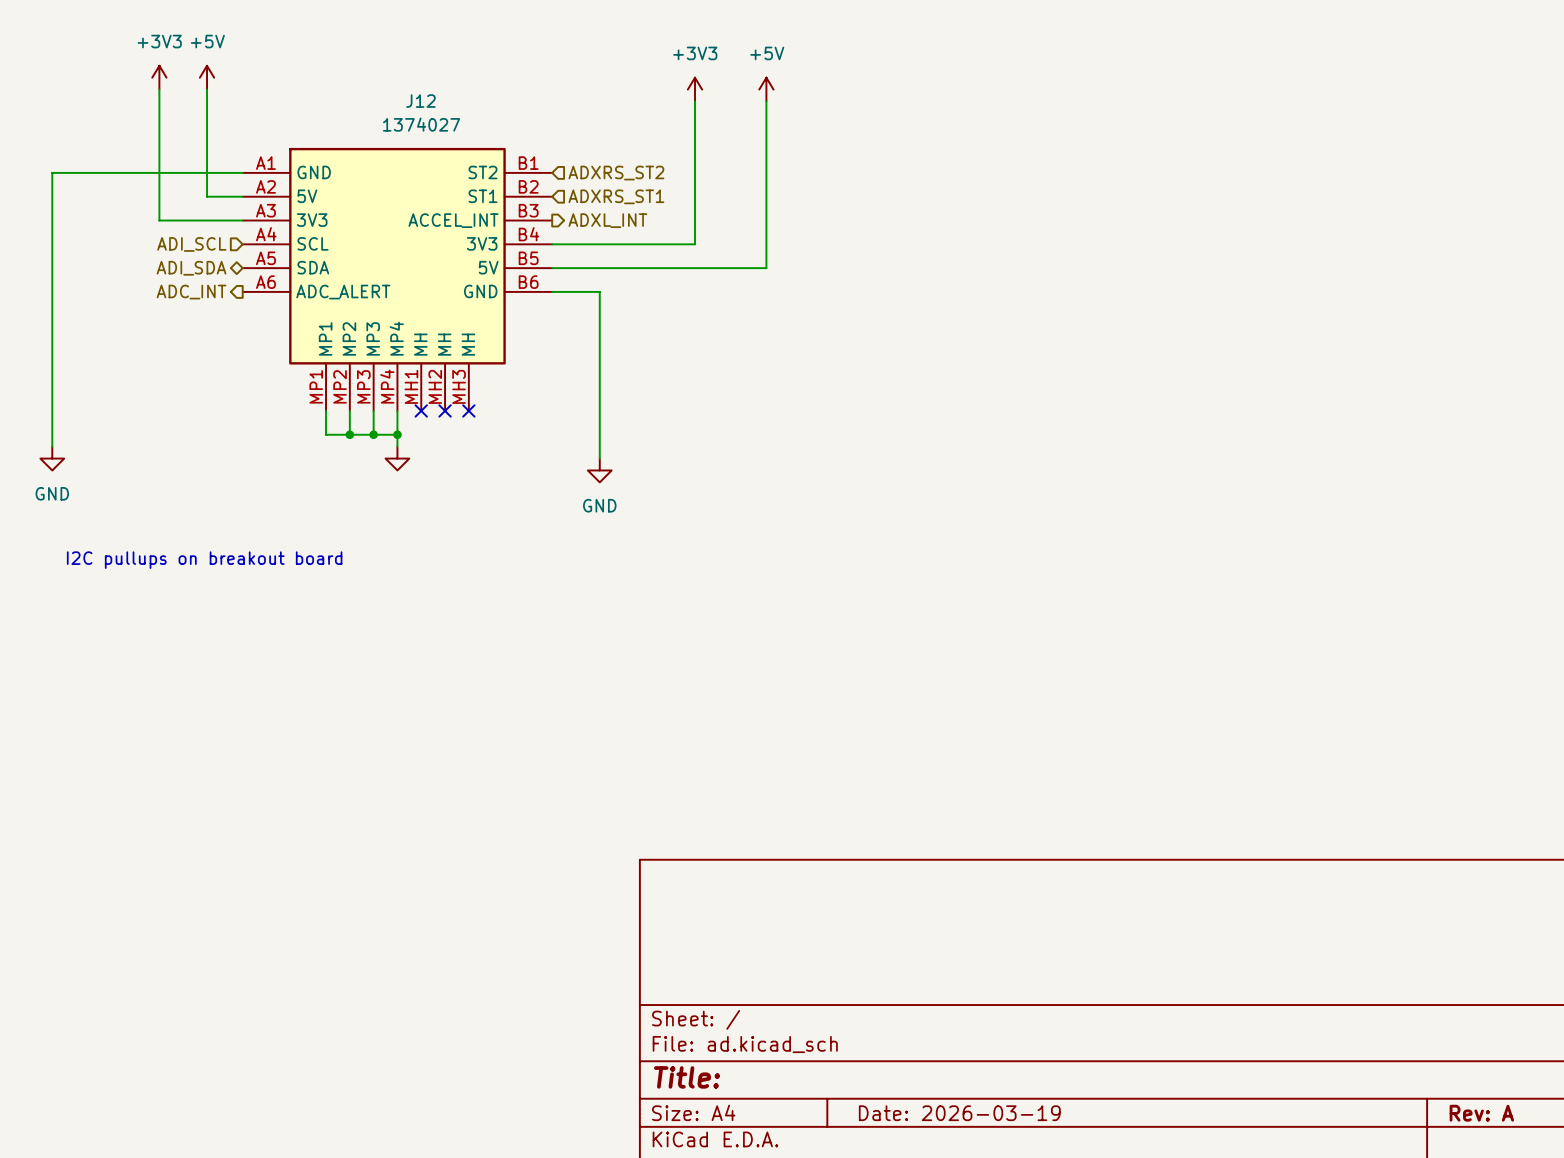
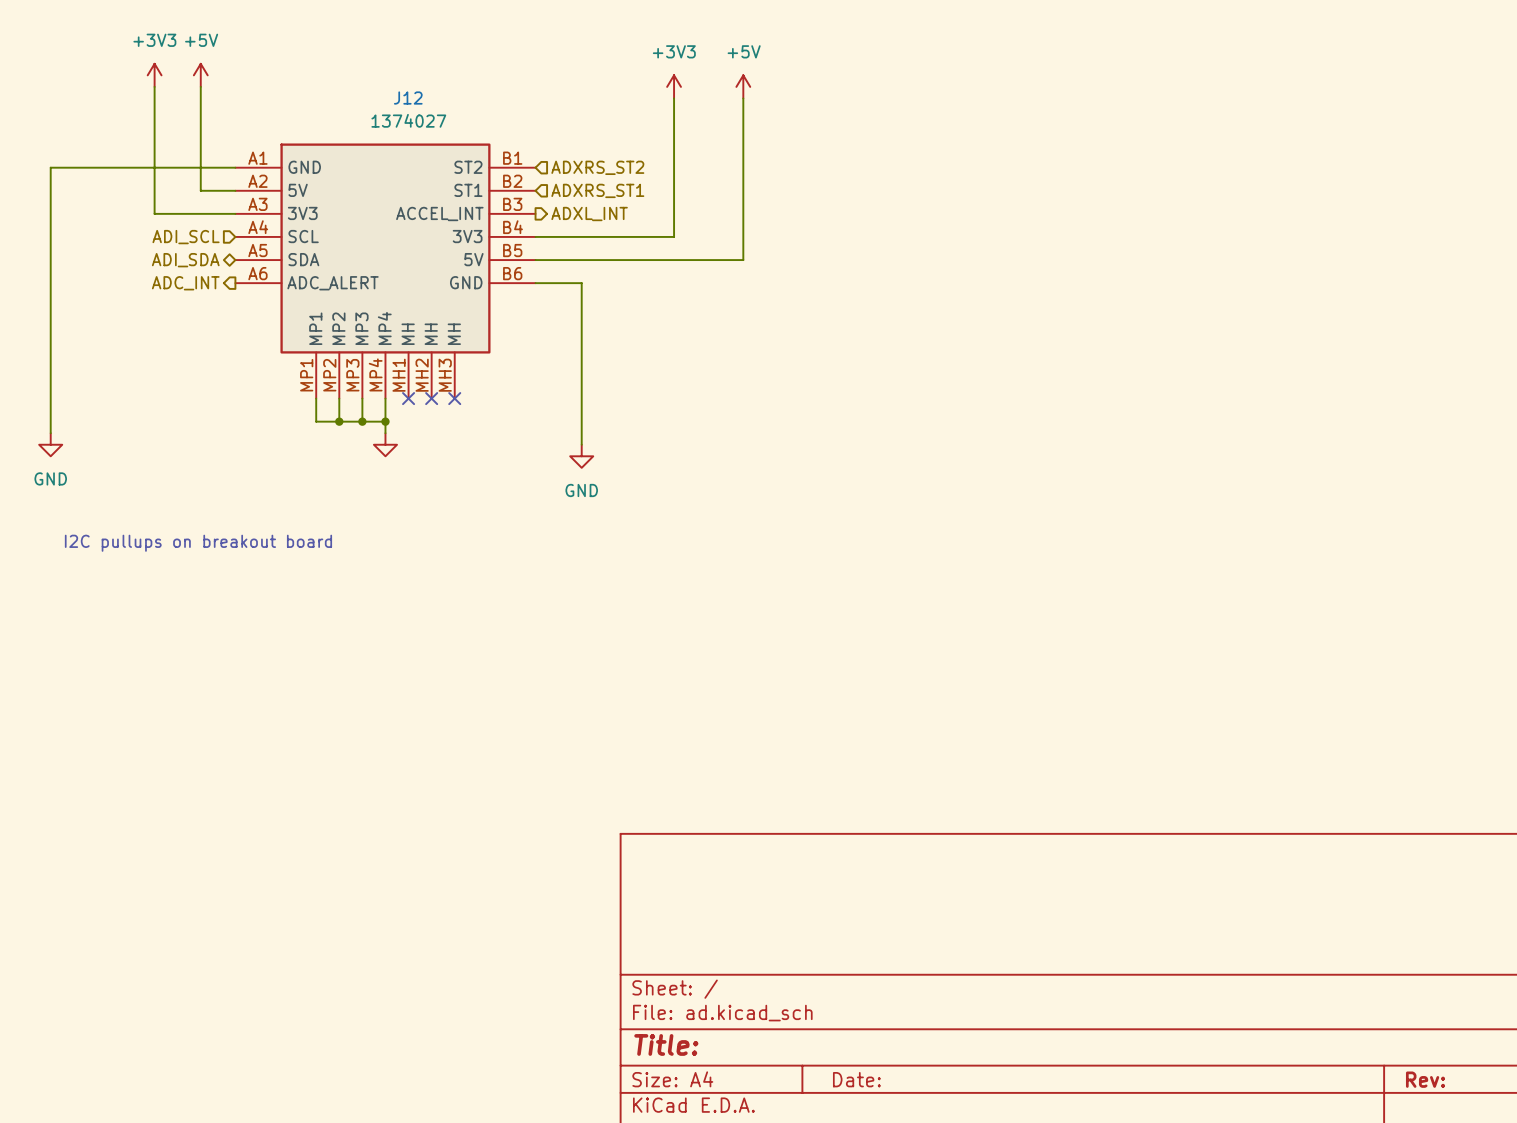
title block: Date: 2026-03-19 (959, 1113) -> Date: (856, 1079)
title block: Rev: A (1481, 1113) -> Rev: (1425, 1079)

